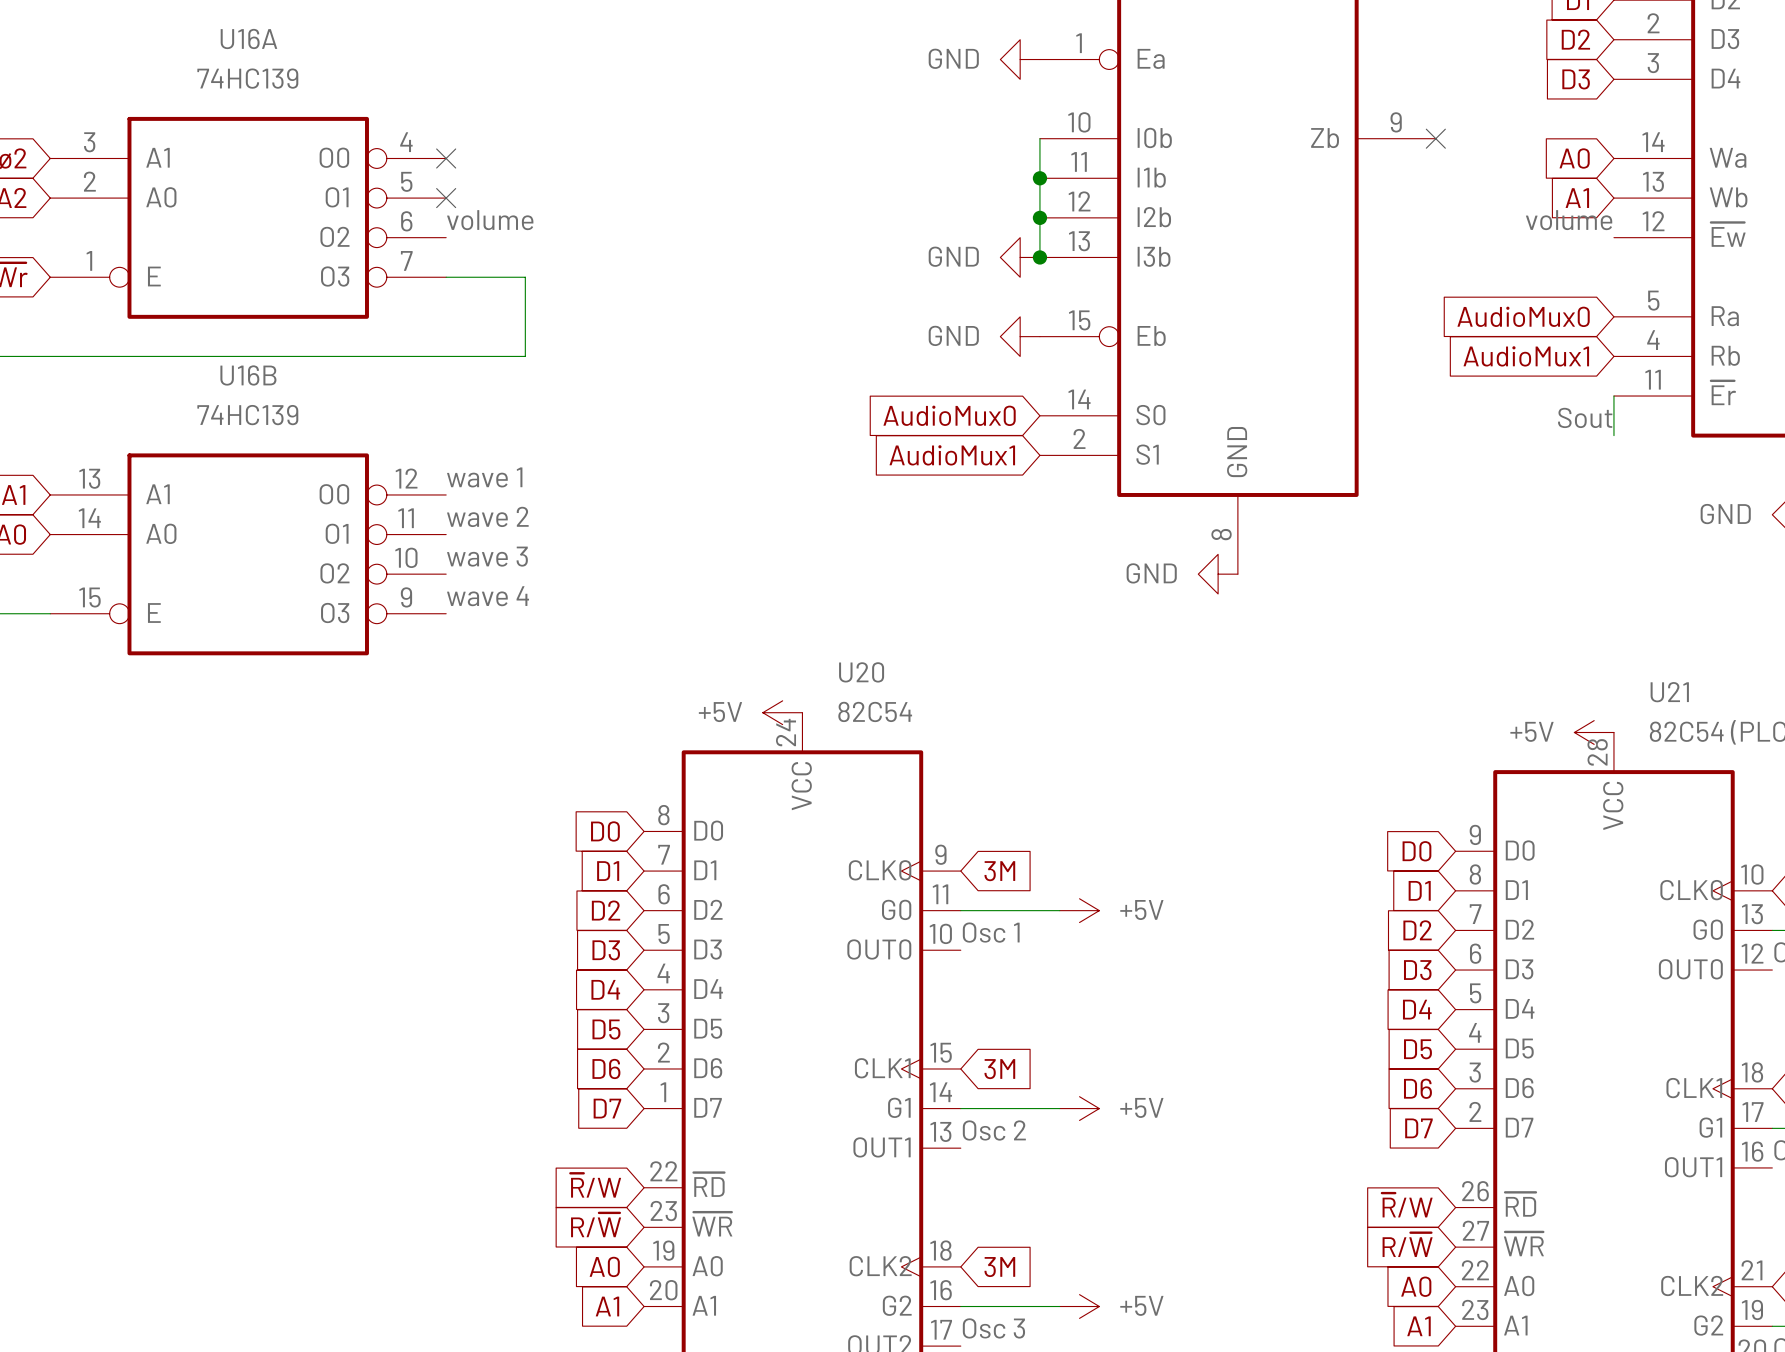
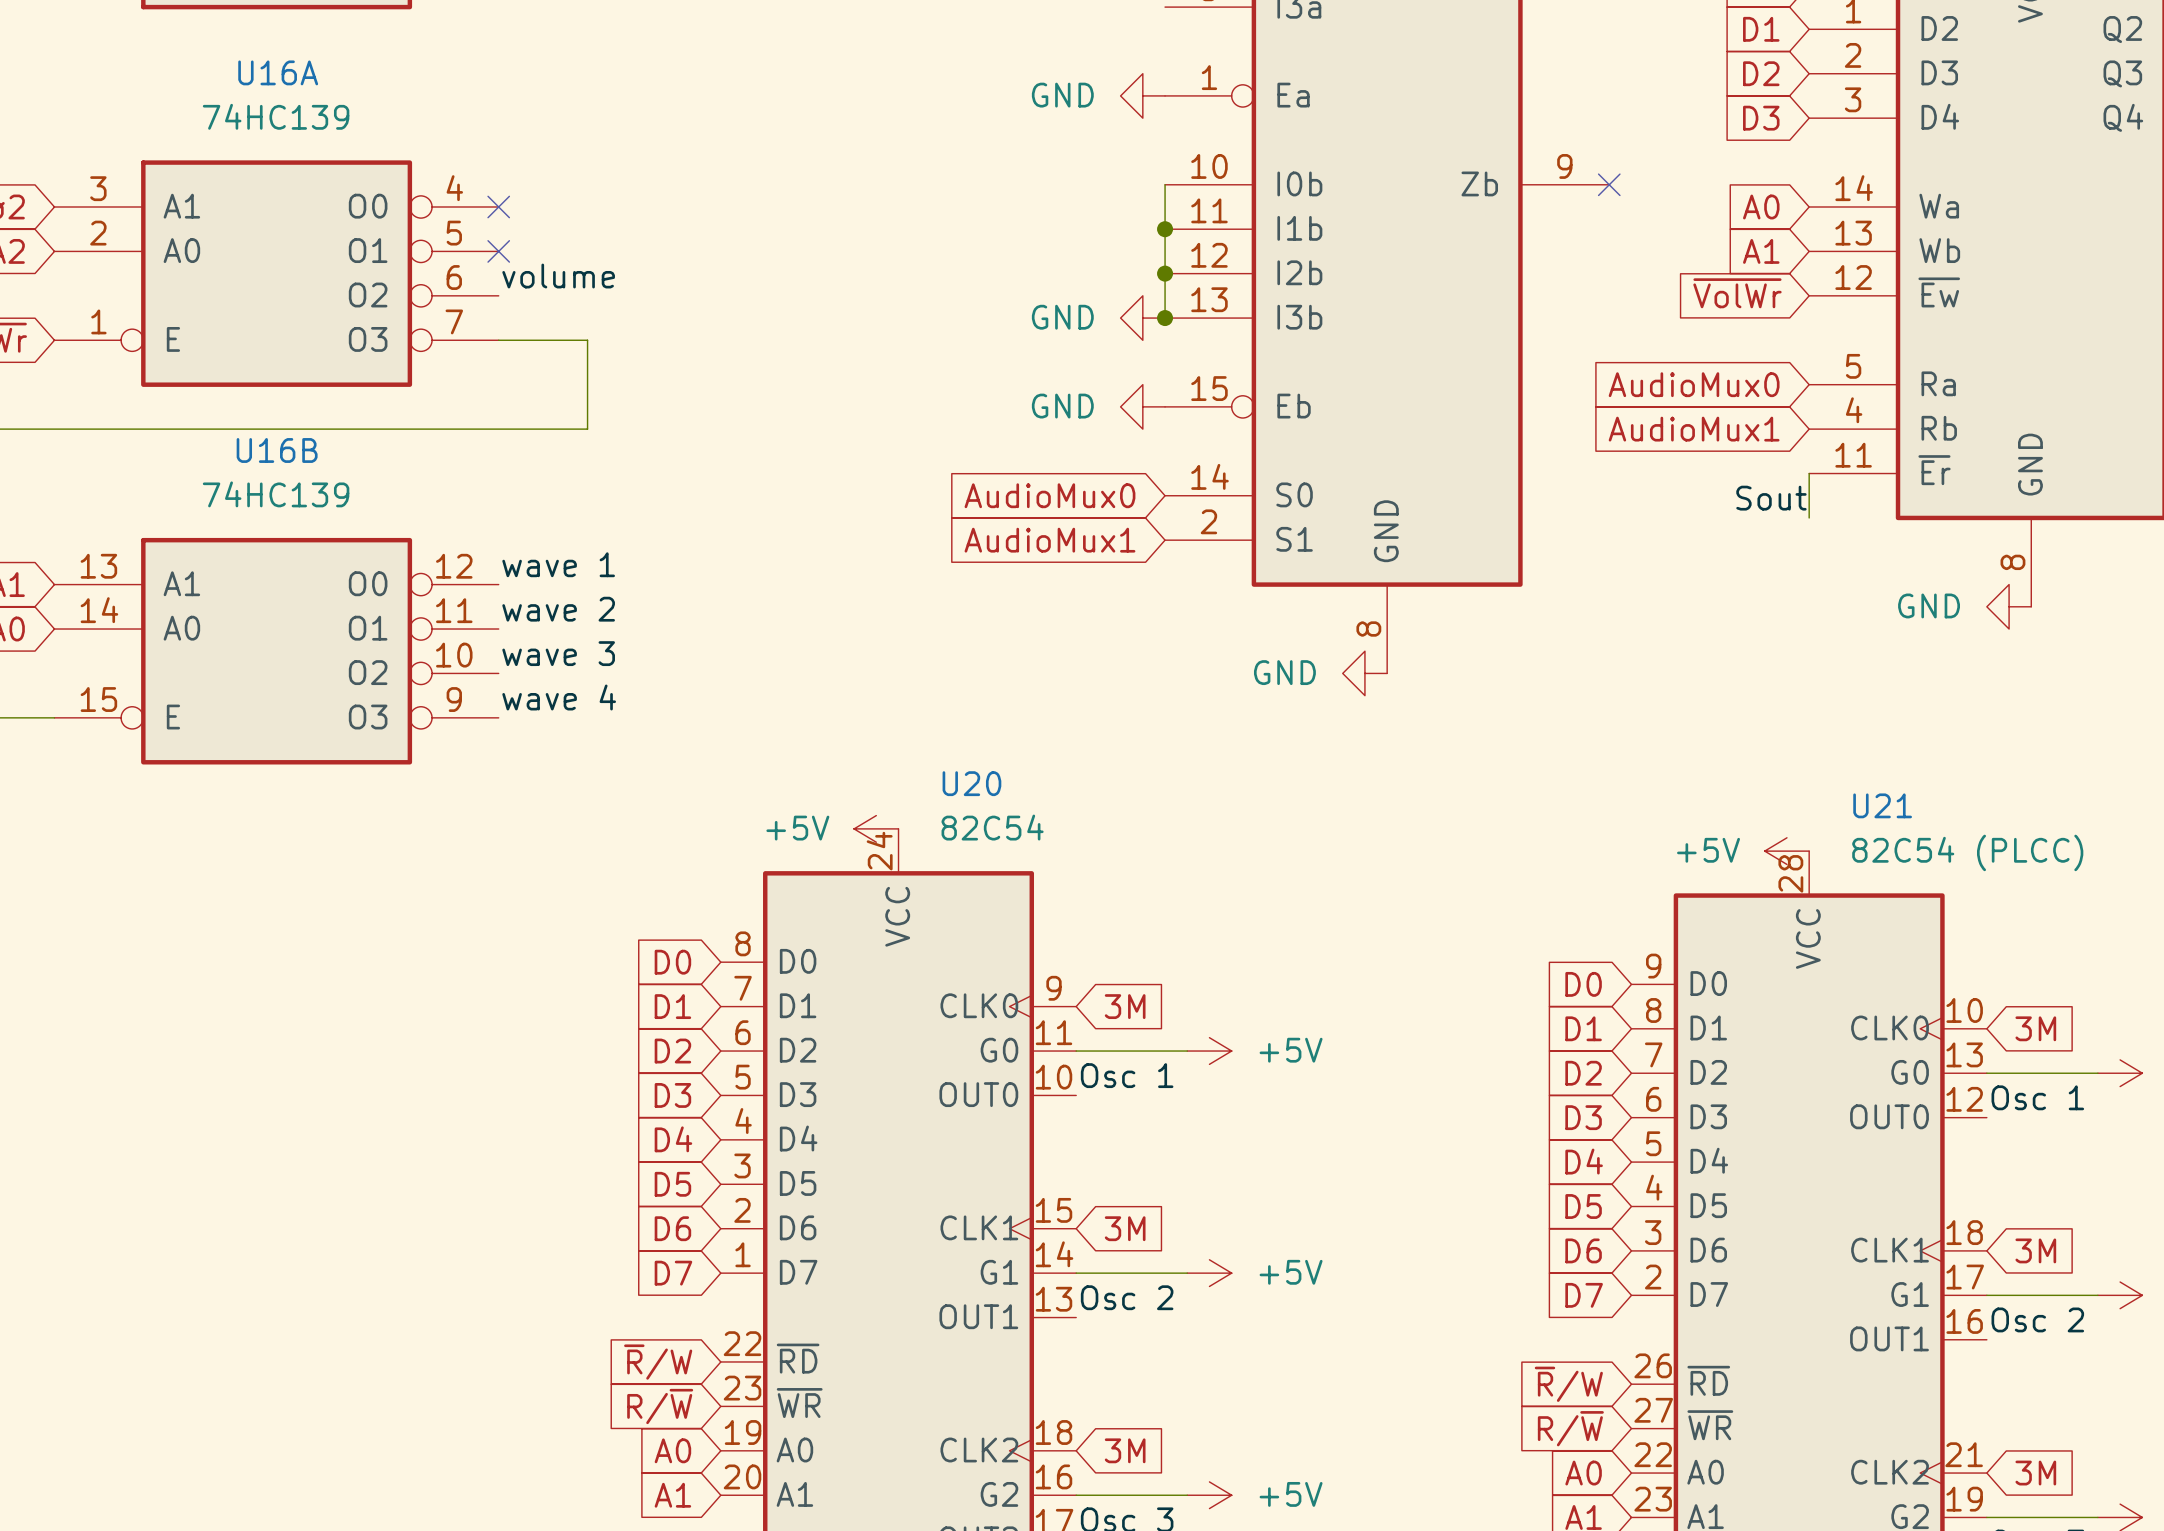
label: volume (1569, 220) -> none
global label: none -> ~{VolWr} (1737, 293)

